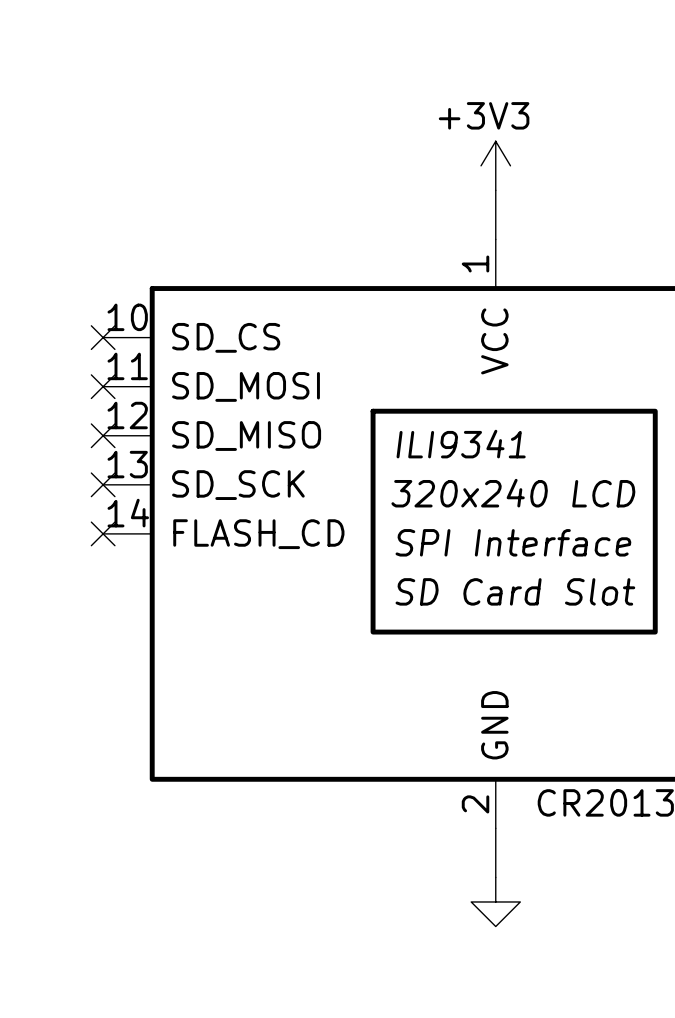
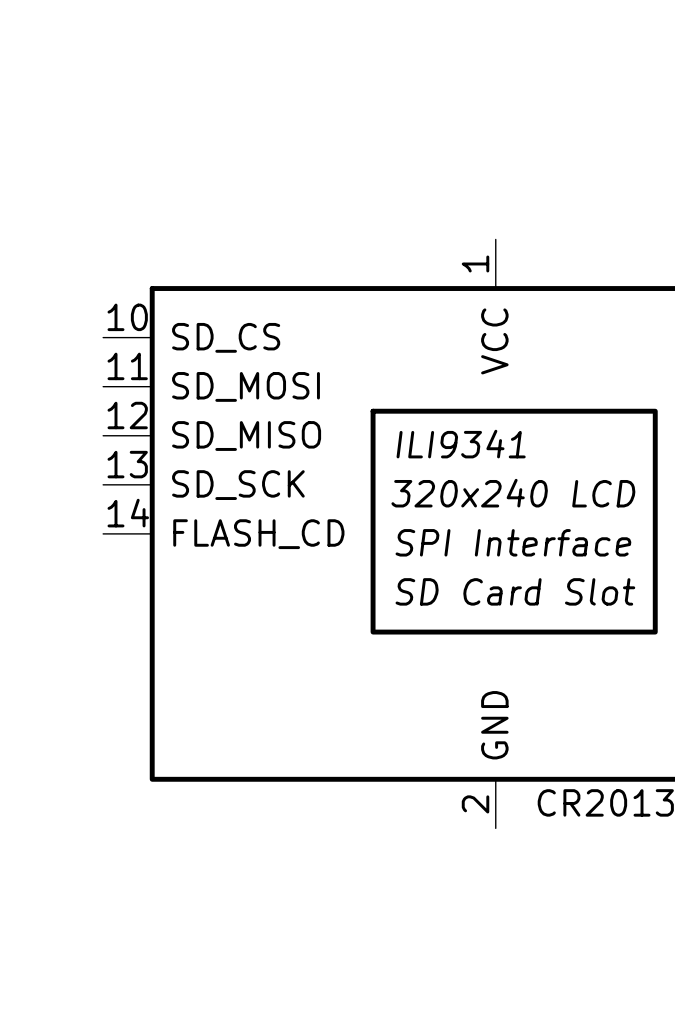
power symbol: +3V3 (495, 165) -> none
wire: (495, 190) (495, 239) -> none
no-connect mark: (103, 337) -> none
no-connect mark: (103, 386) -> none
no-connect mark: (103, 435) -> none
no-connect mark: (103, 484) -> none
no-connect mark: (103, 533) -> none
wire: (495, 828) (495, 877) -> none
power symbol: (495, 901) -> none

